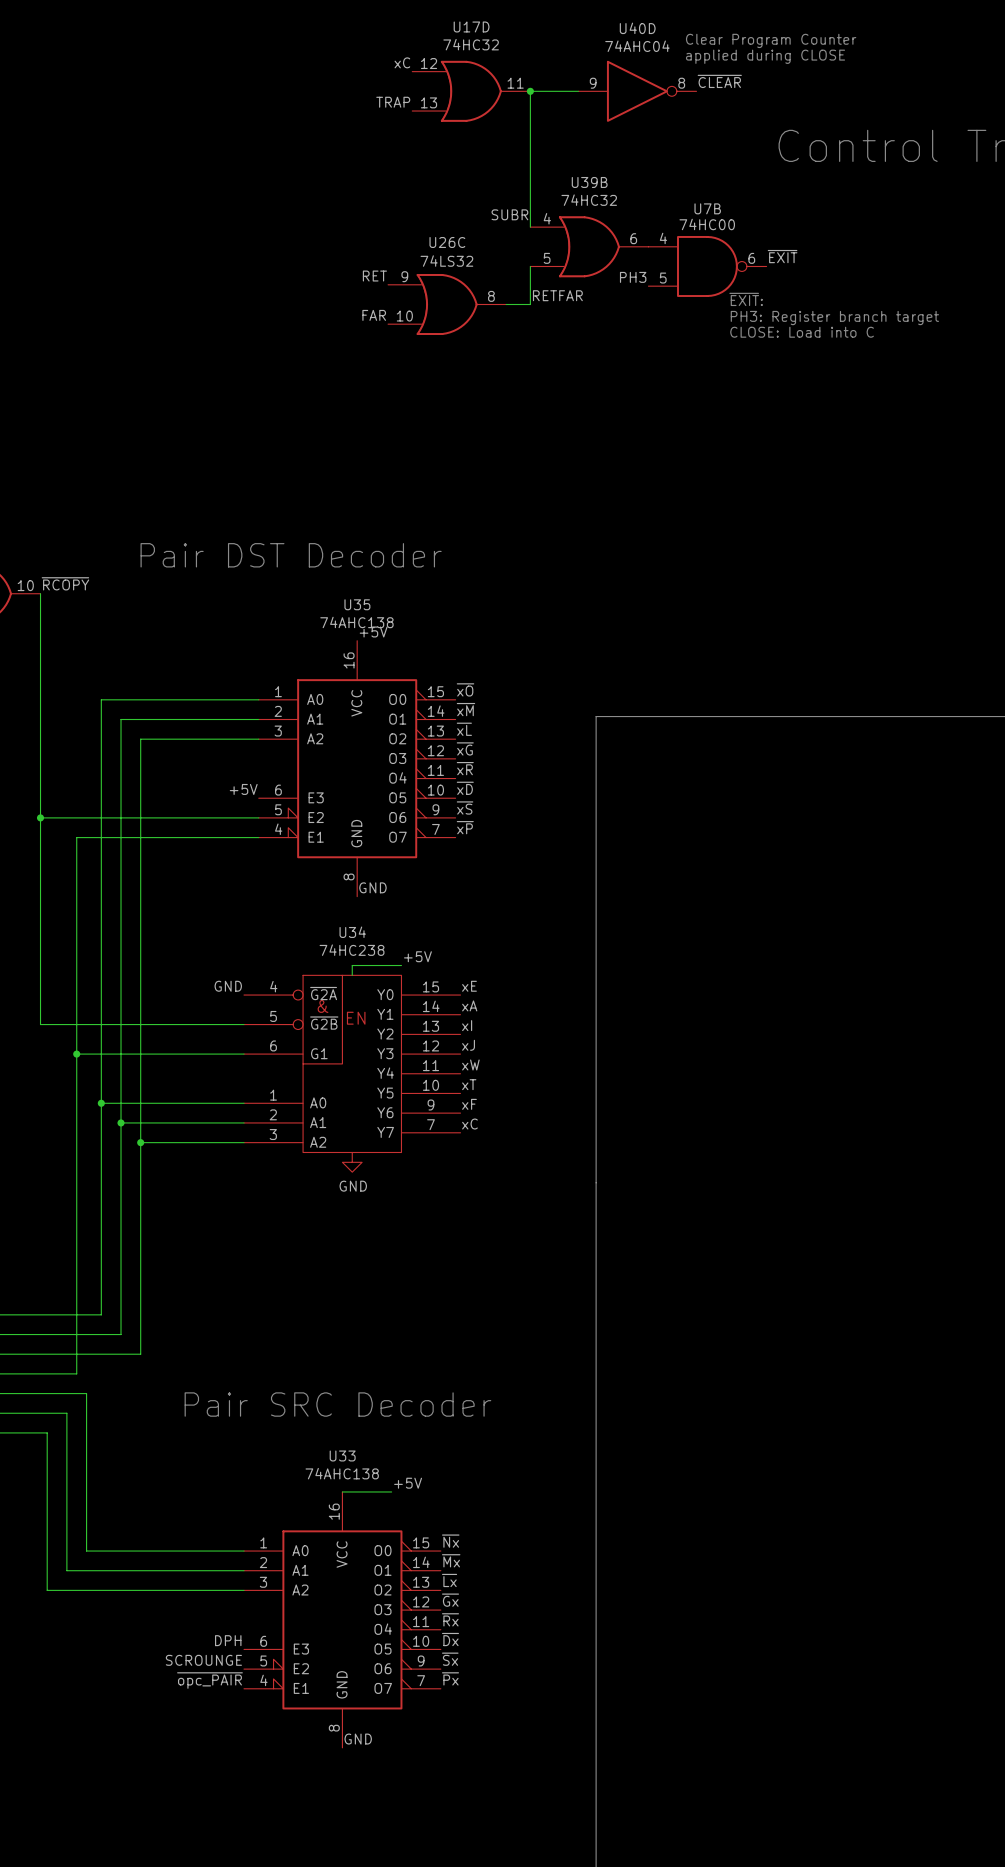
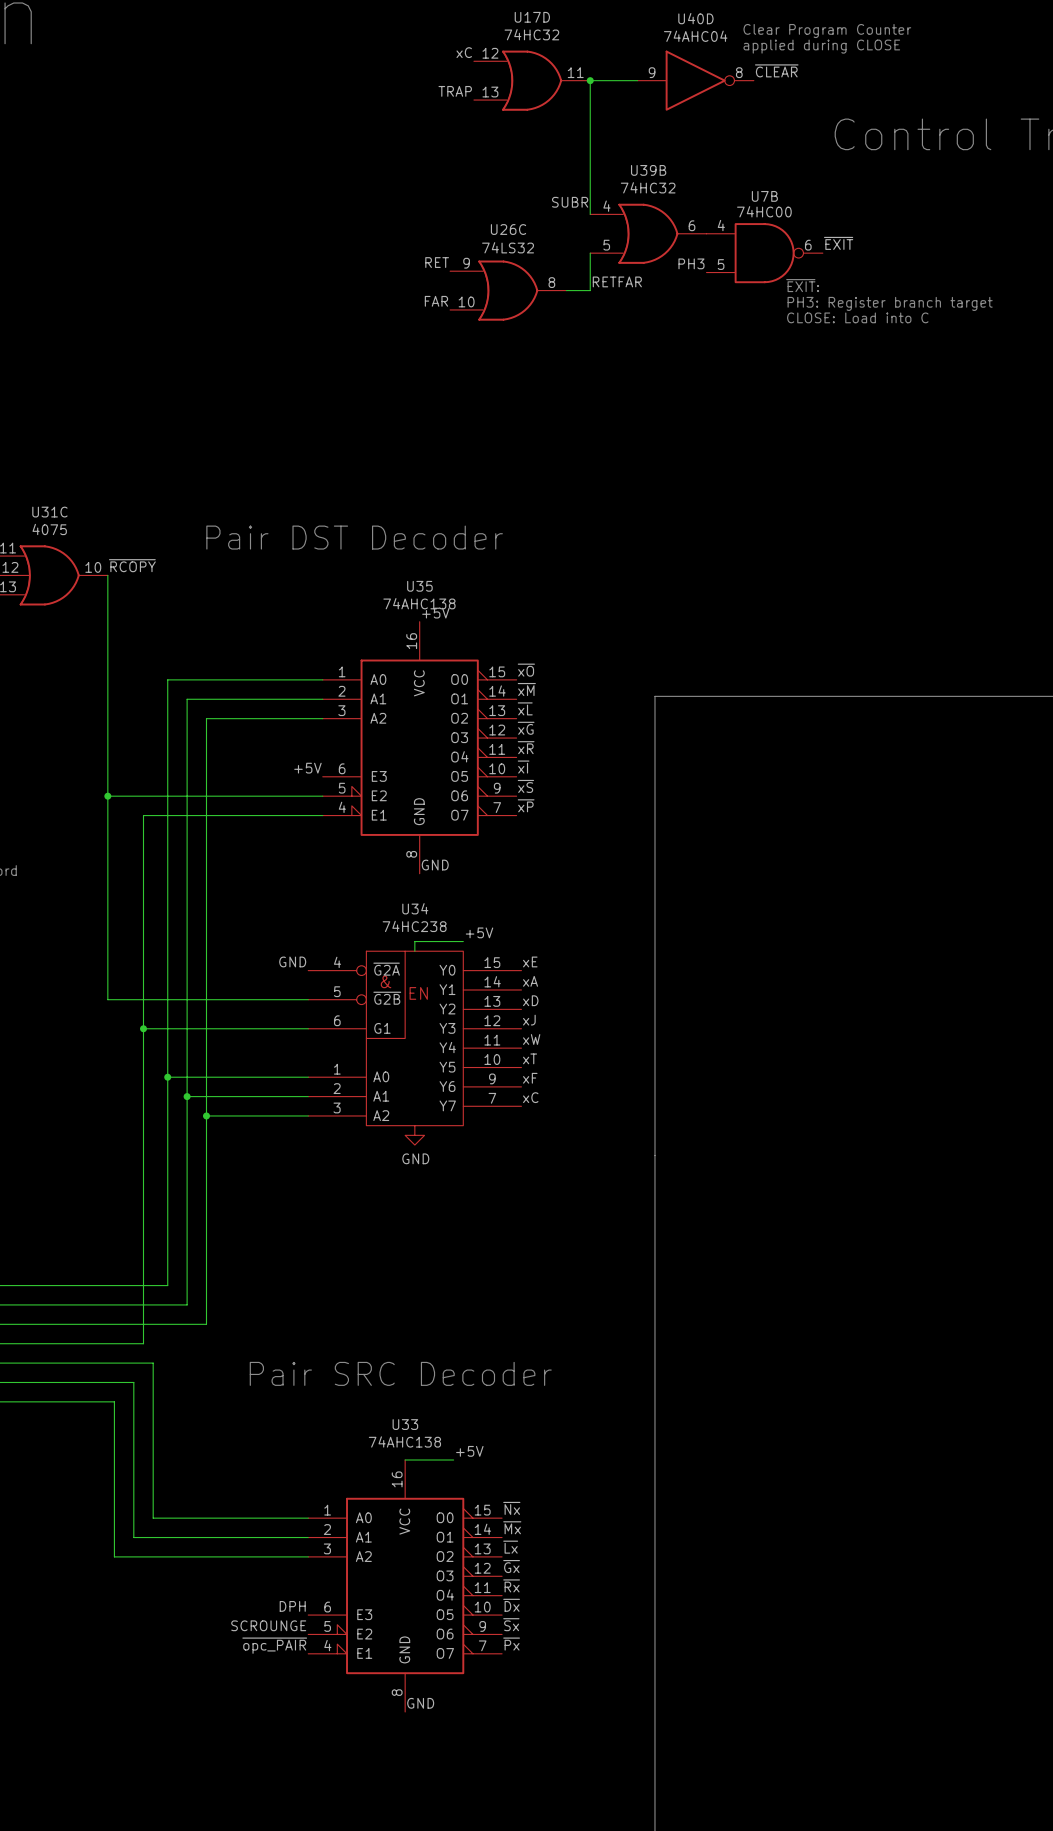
label: ~{xD} (465, 788) -> ~{xI} (523, 767)
label: xI (467, 1025) -> xD (530, 1000)

